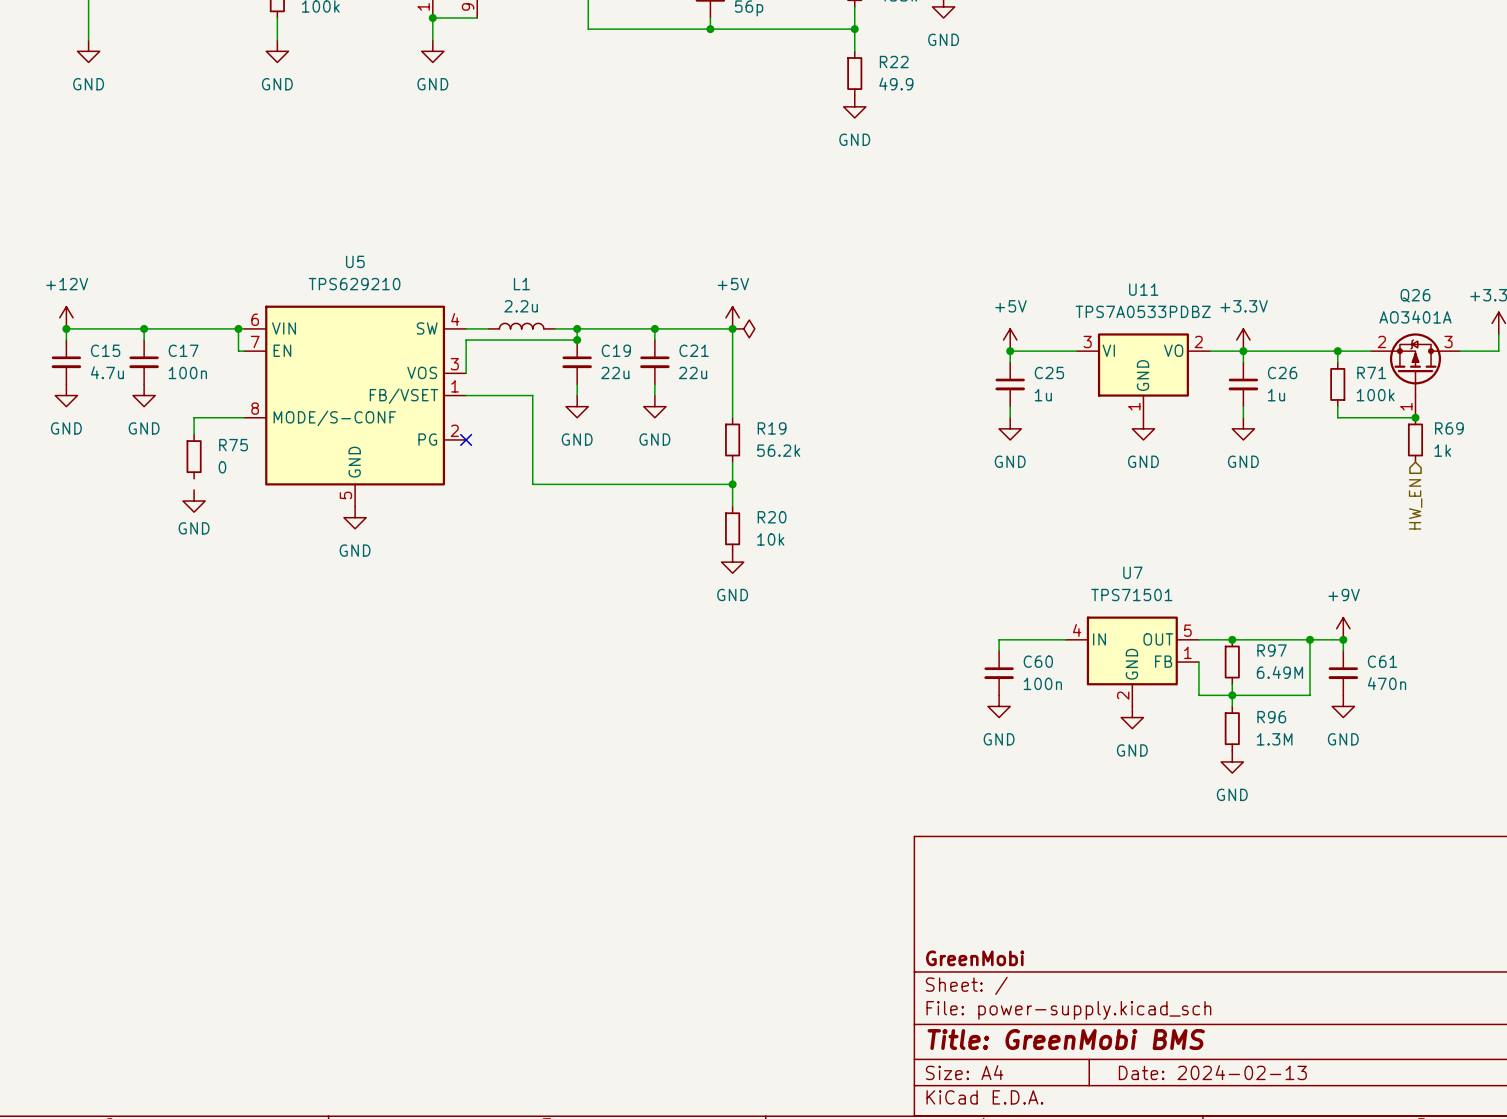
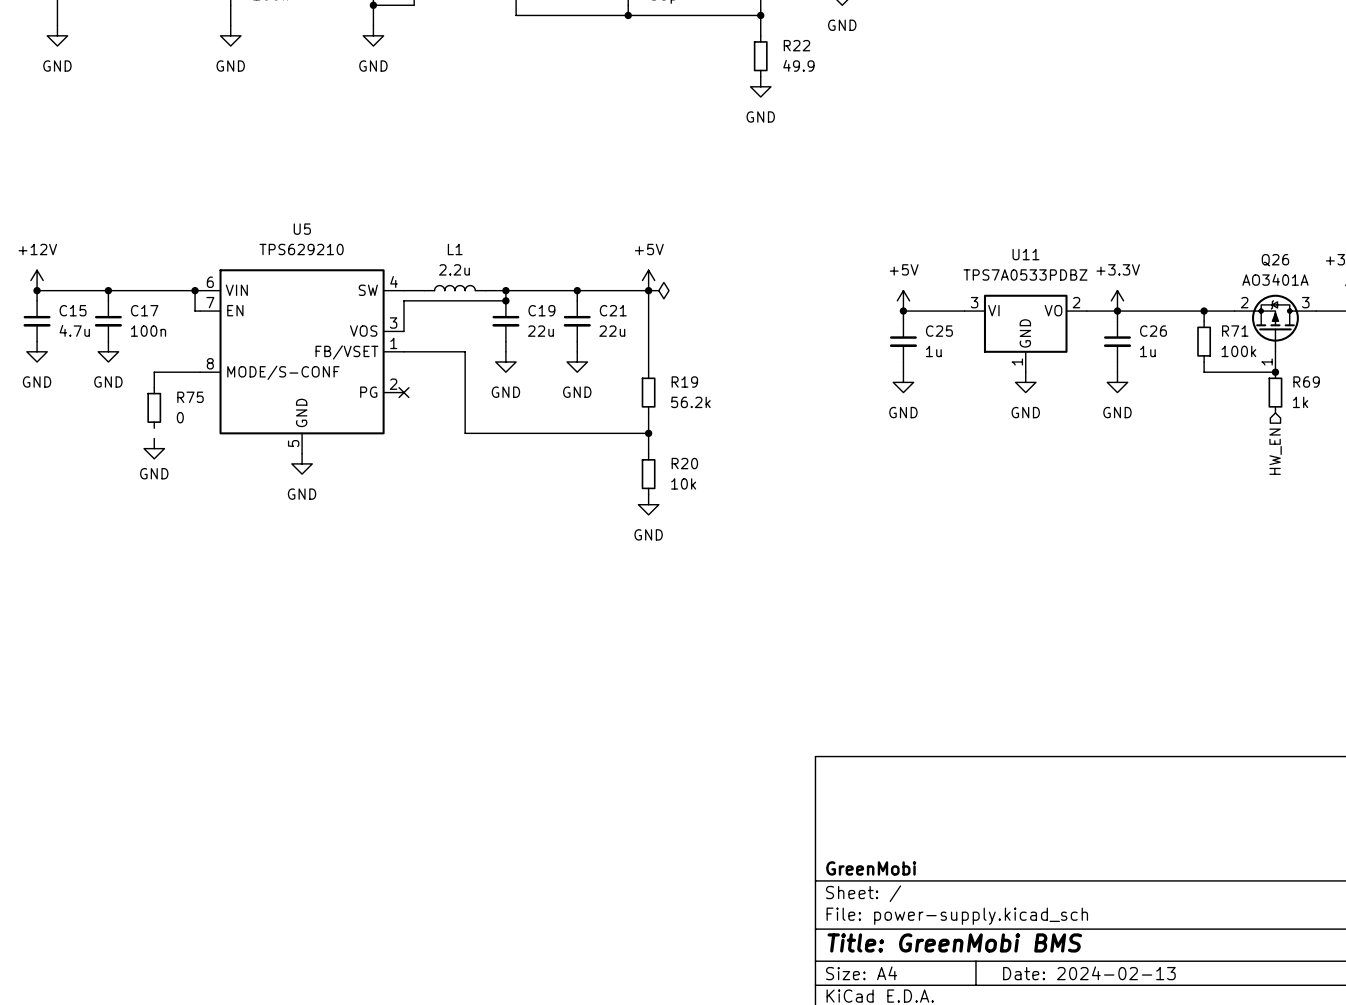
power symbol: +9V (1343, 628) -> none
wire: (1065, 639) (999, 639) (999, 650) -> none
wire: (1198, 639) (1343, 639) (1343, 650) -> none
junction: (1232, 639) -> none
wire: (1310, 639) (1310, 695) (1198, 695) (1198, 662) -> none
junction: (1310, 639) -> none
junction: (1343, 639) -> none
U7: TPS71501 (1132, 661) -> none
R97: 6.49M (1232, 662) -> none
C60: 100n (999, 673) -> none
C61: 470n (1343, 673) -> none
wire: (1232, 684) (1232, 706) -> none
junction: (1232, 695) -> none
power symbol: GND (999, 706) -> none
power symbol: GND (1343, 706) -> none
power symbol: GND (1132, 717) -> none
R96: 1.3M (1232, 728) -> none
power symbol: GND (1232, 761) -> none

